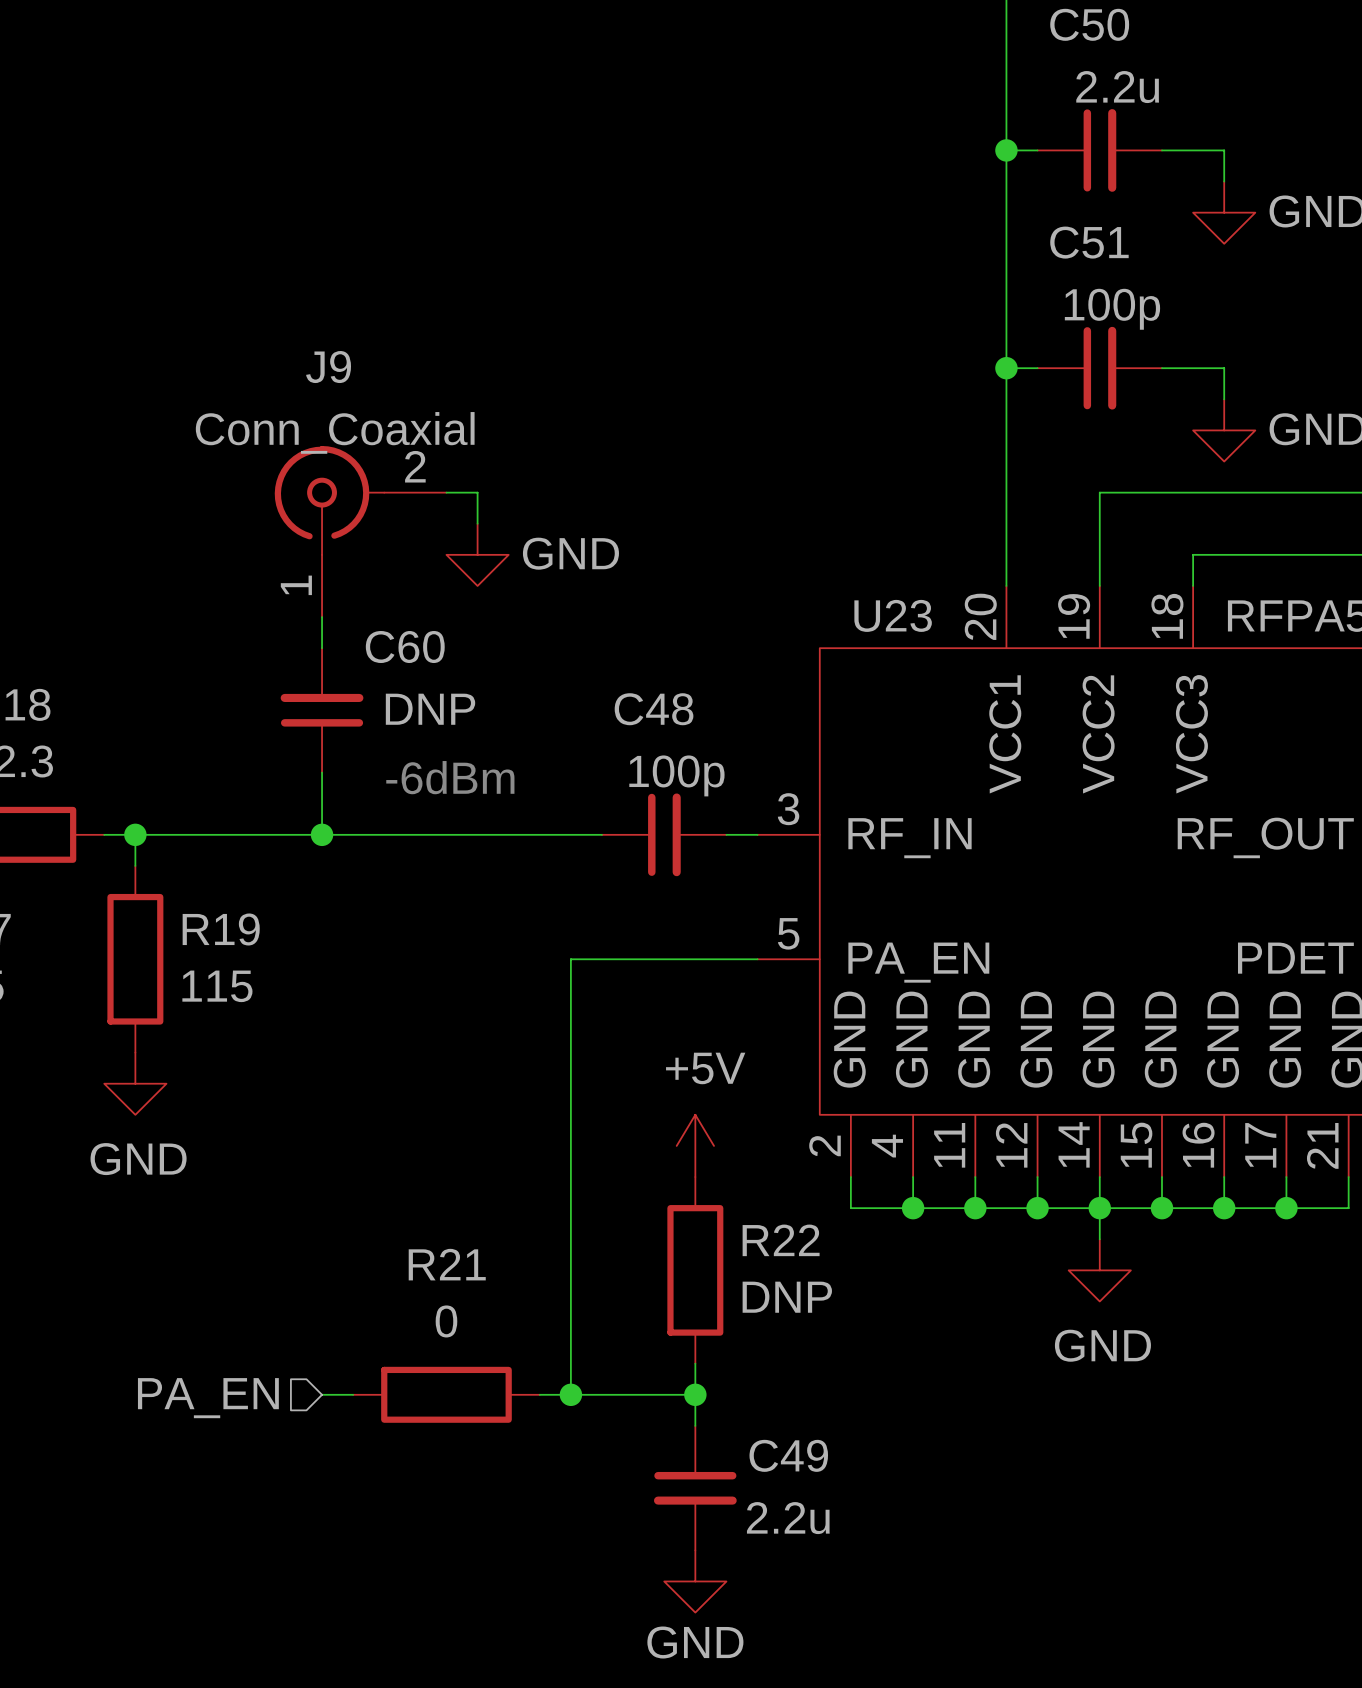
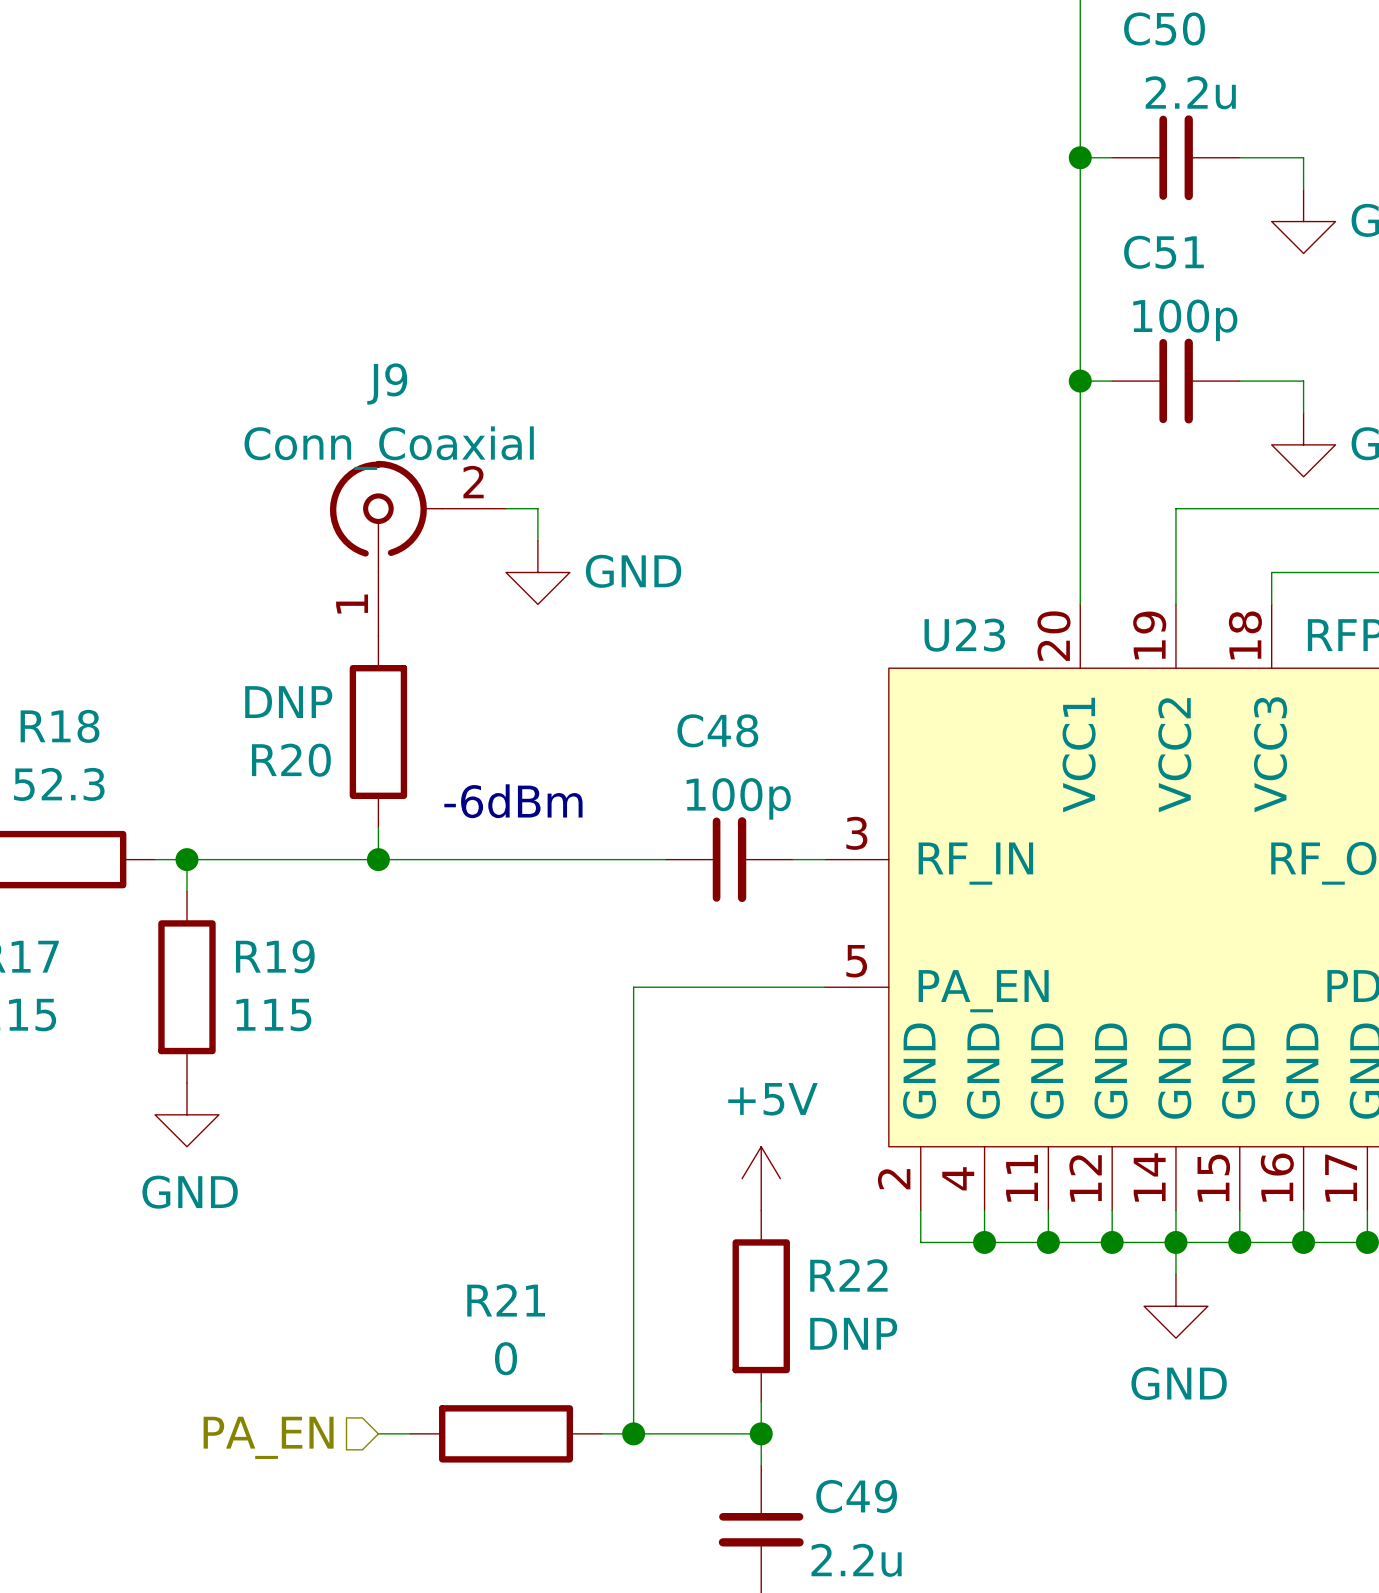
C60: DNP (322, 710) -> none
R20: none -> DNP (378, 732)

